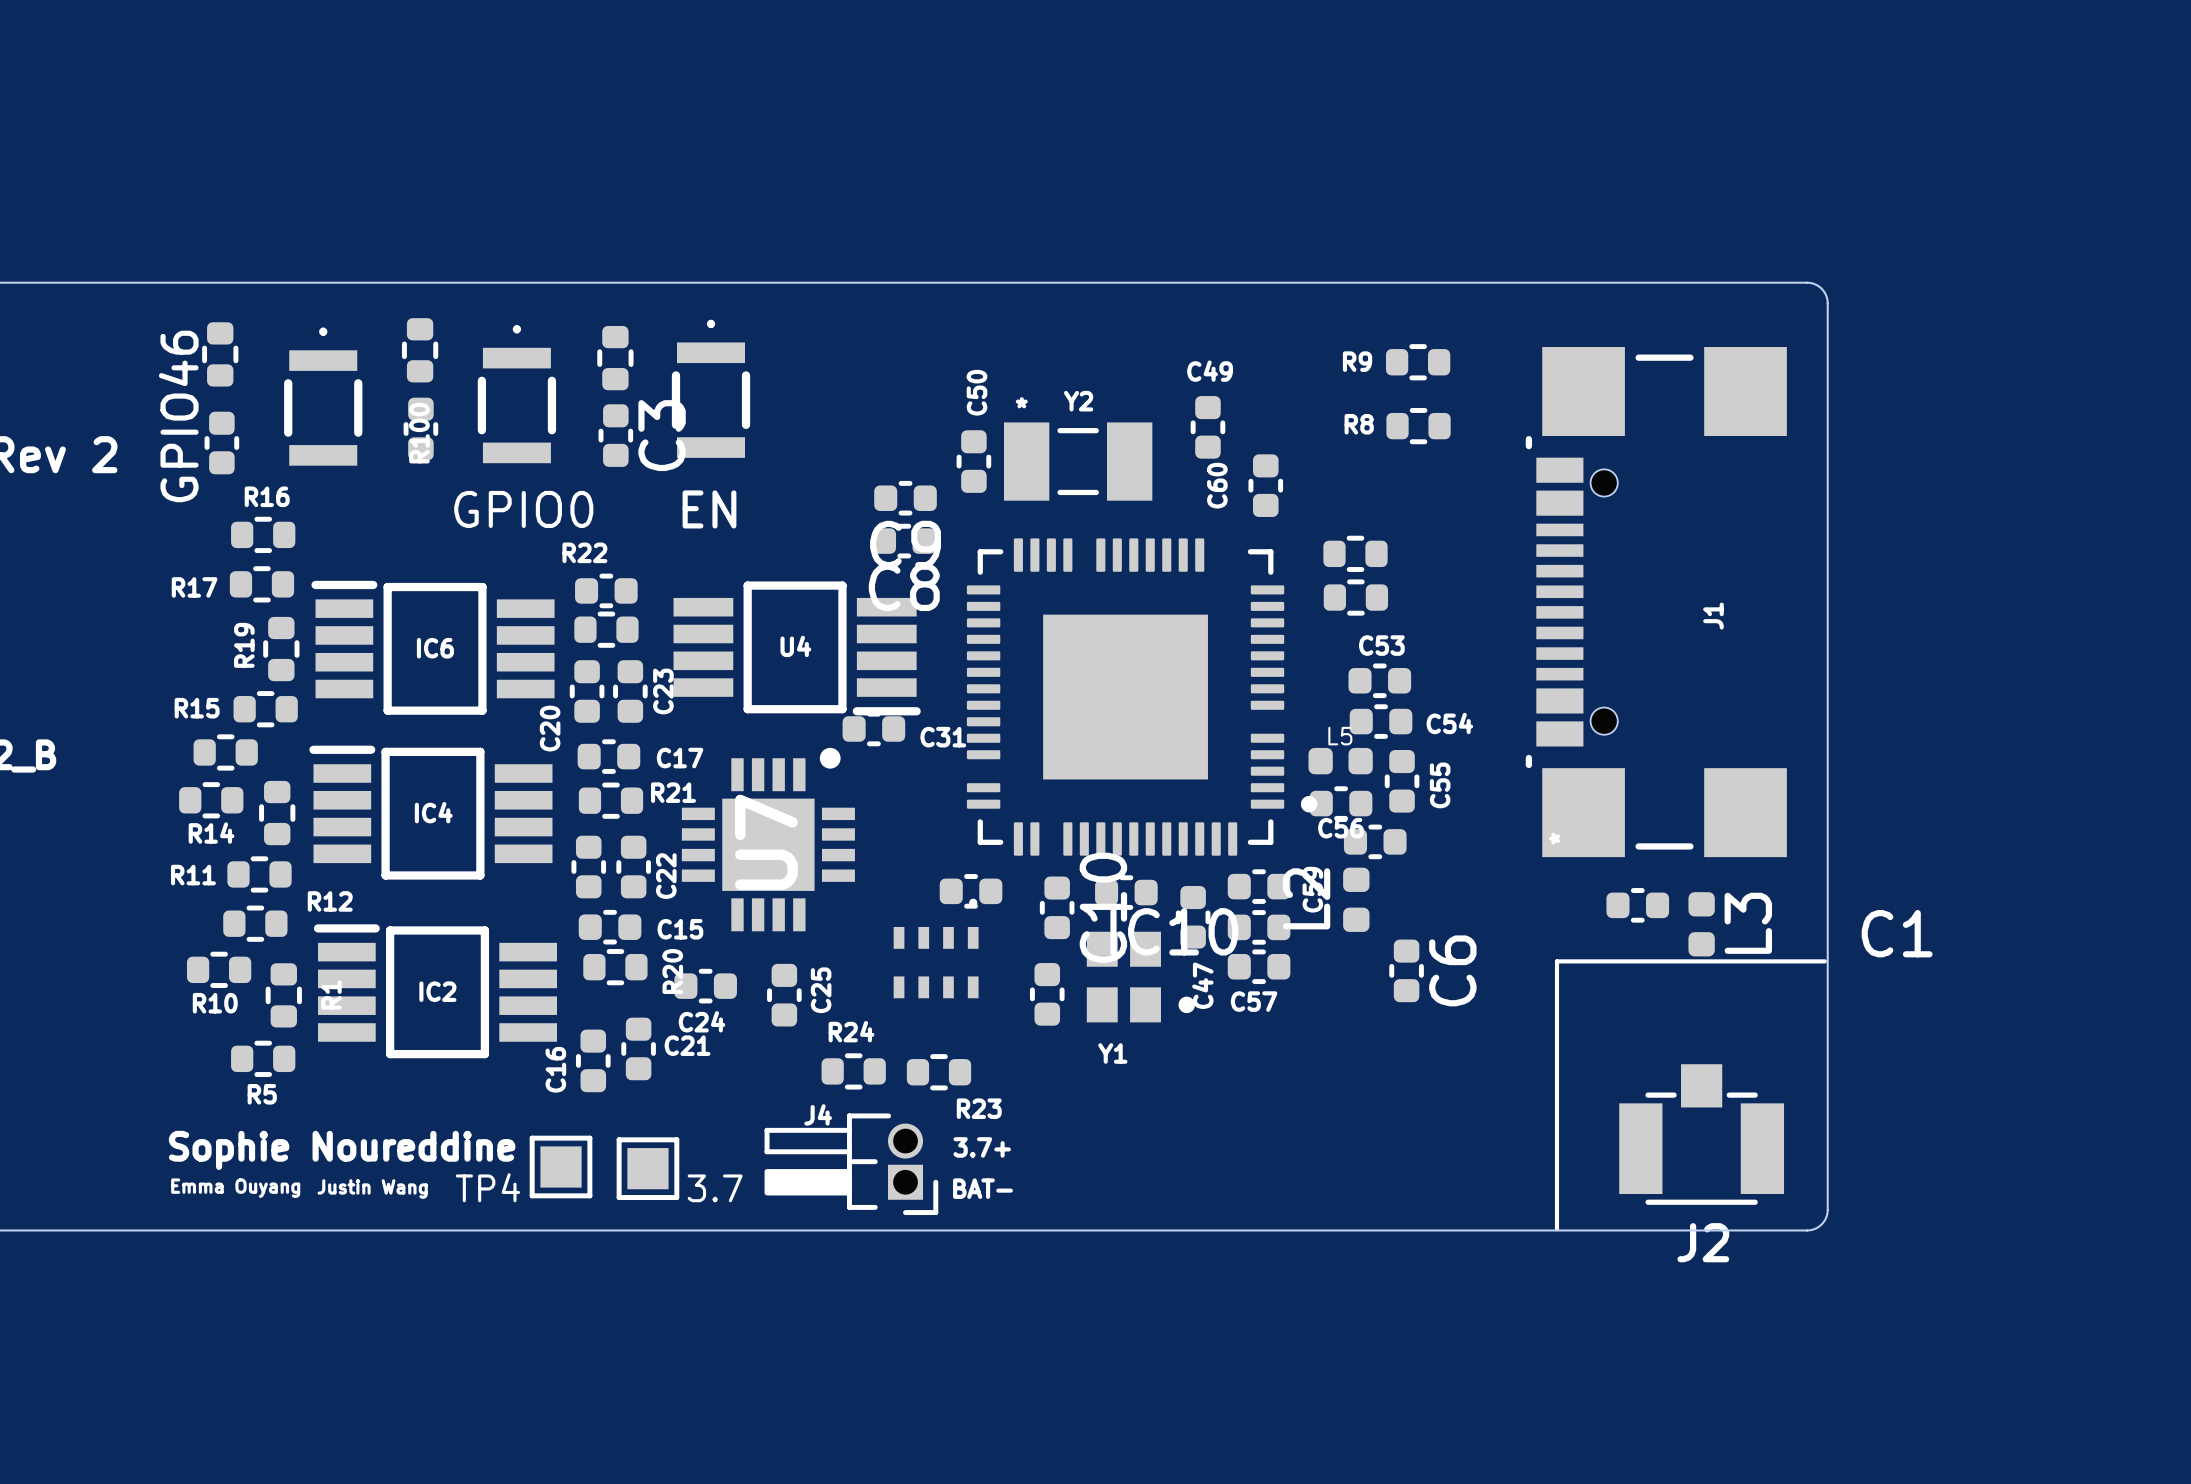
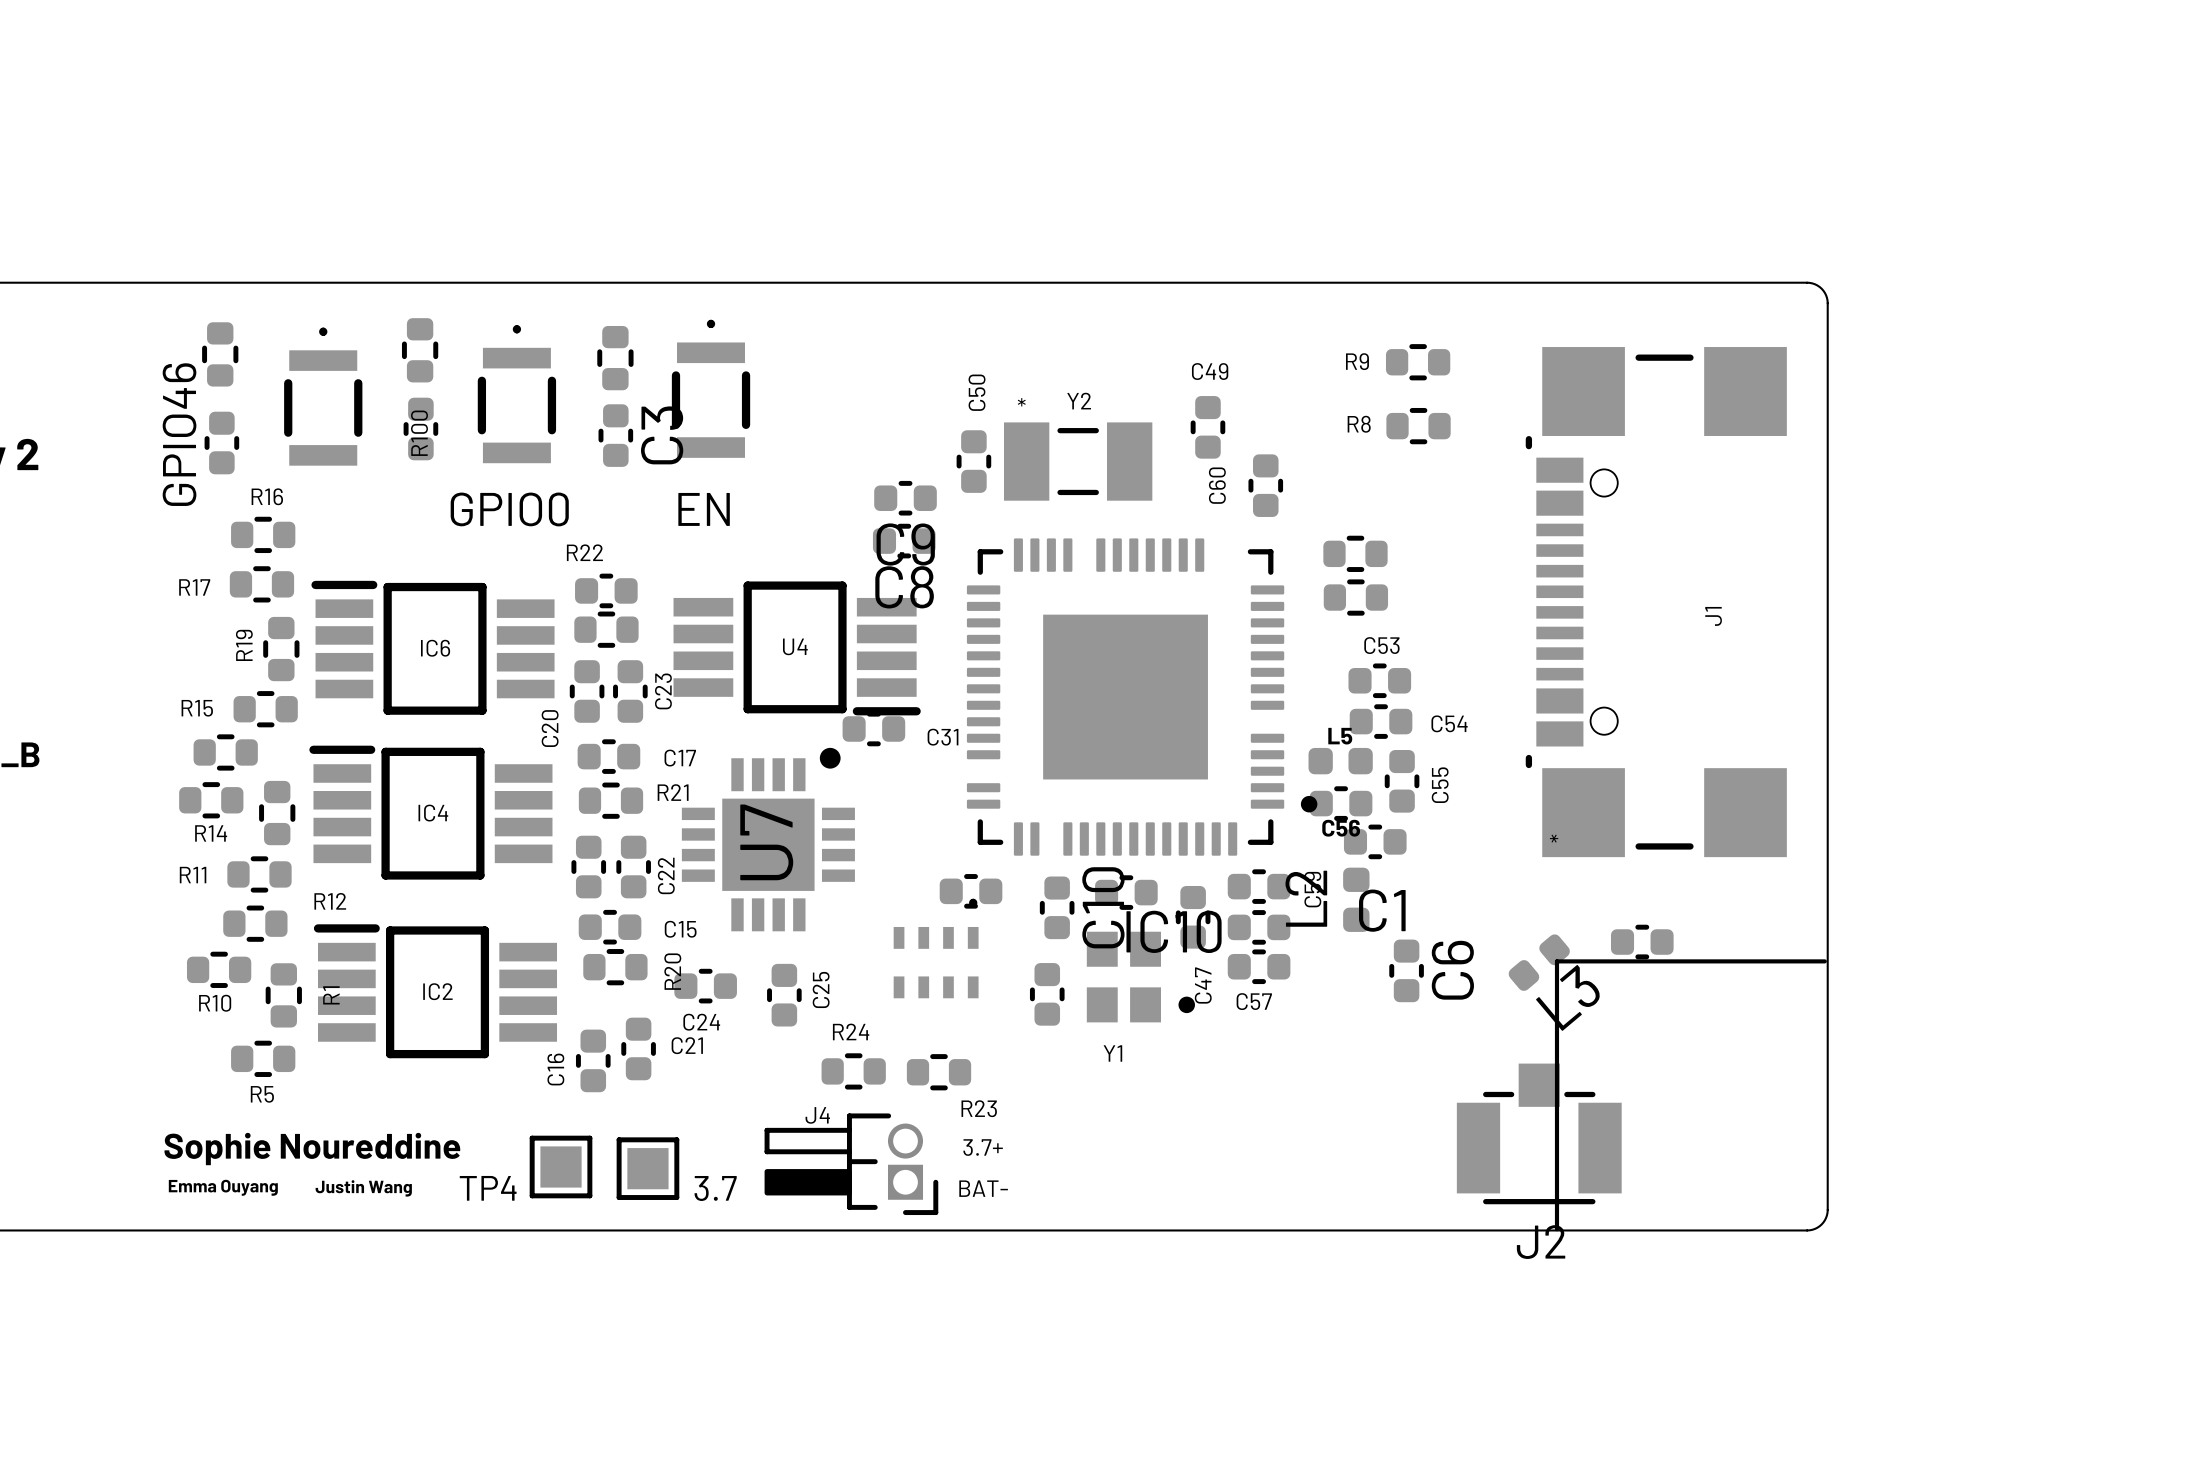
C1 position: (1637, 905) -> (1642, 942)
L3 rotation: 0° (1701, 924) -> 50° clockwise (1539, 962)
L3 position: (1701, 924) -> (1539, 962)
C1 name position: C1 (1897, 933) -> C1 (1382, 910)
J2 position: (1701, 1134) -> (1539, 1133)

